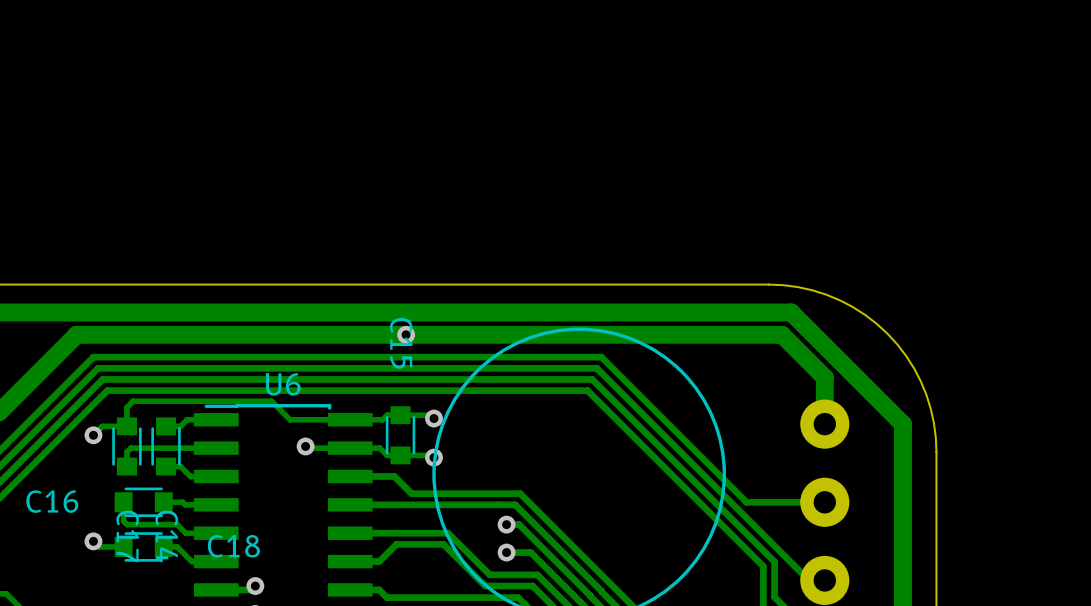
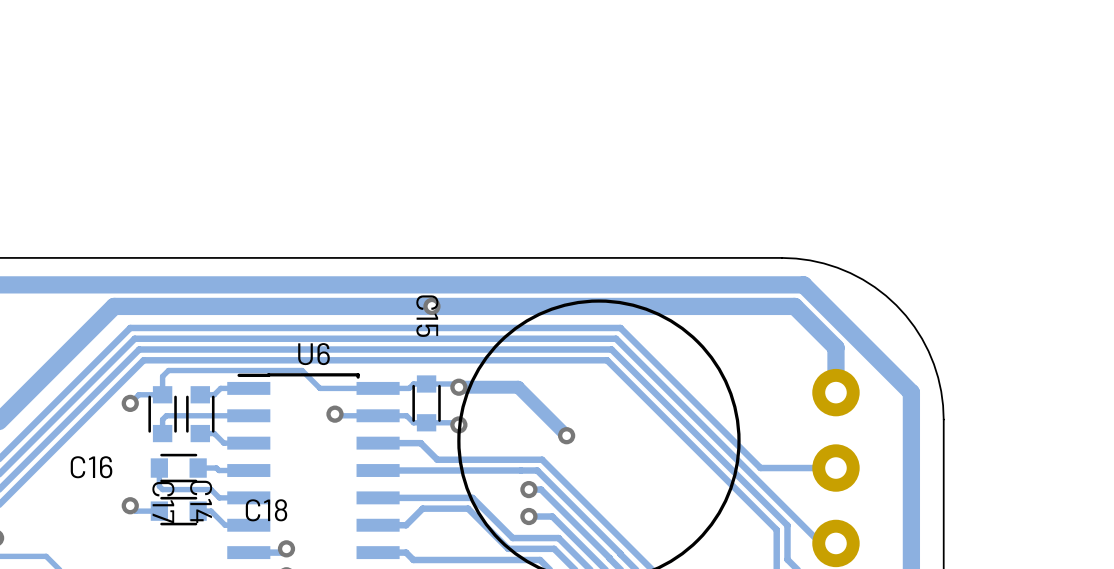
track: none -> (458, 387) (518, 387) (566, 435)
via: none -> (566, 435)

